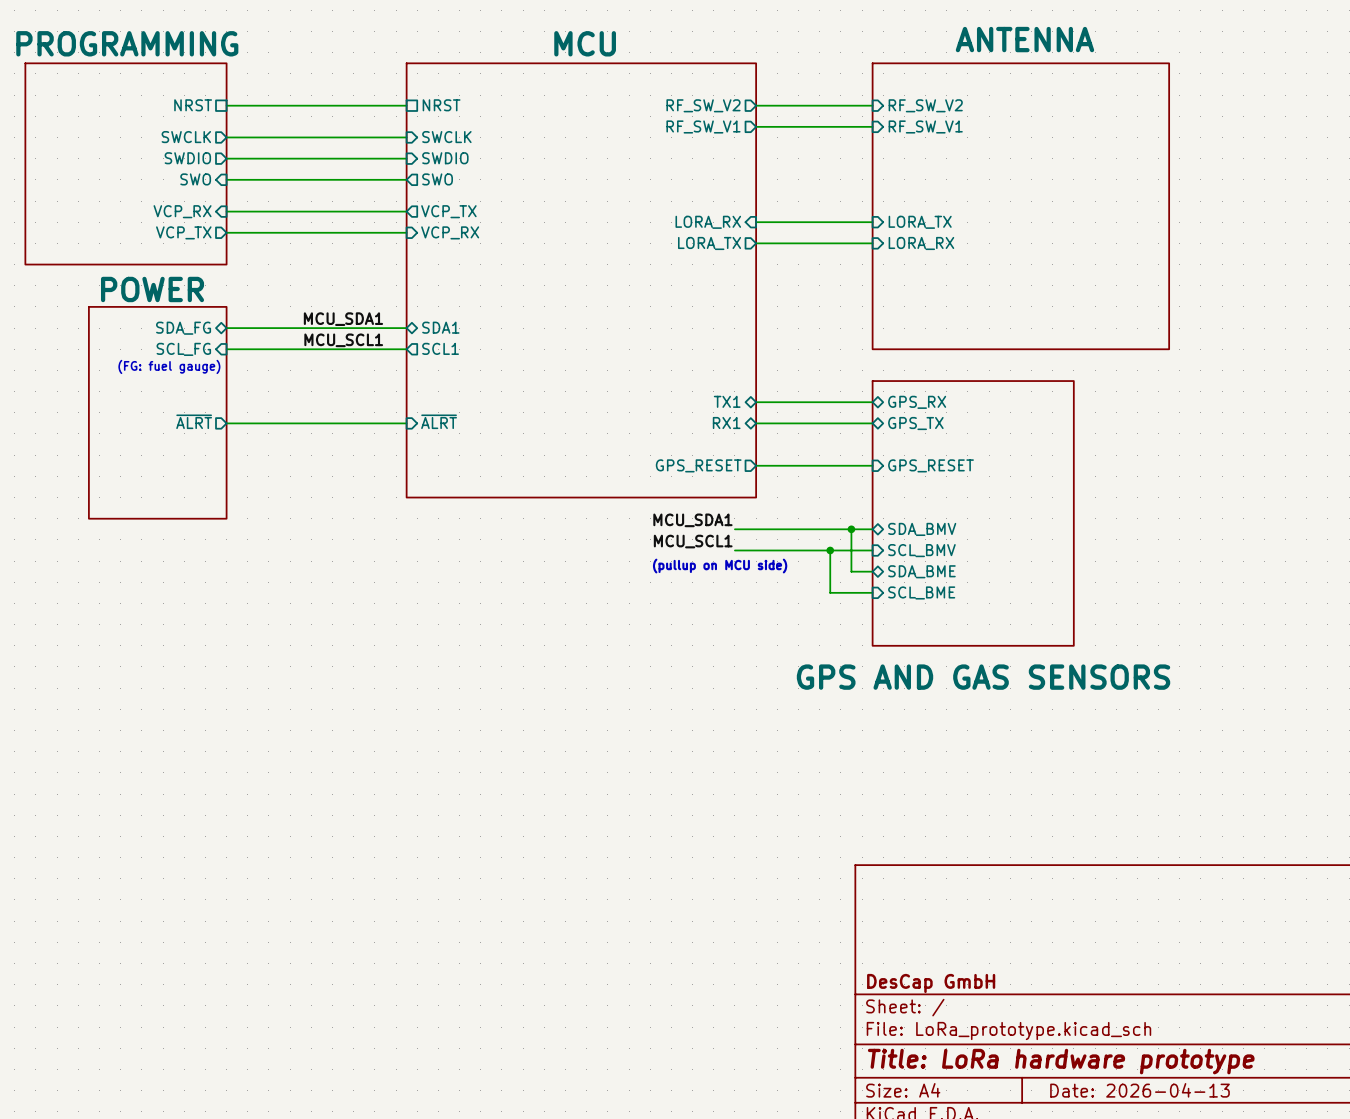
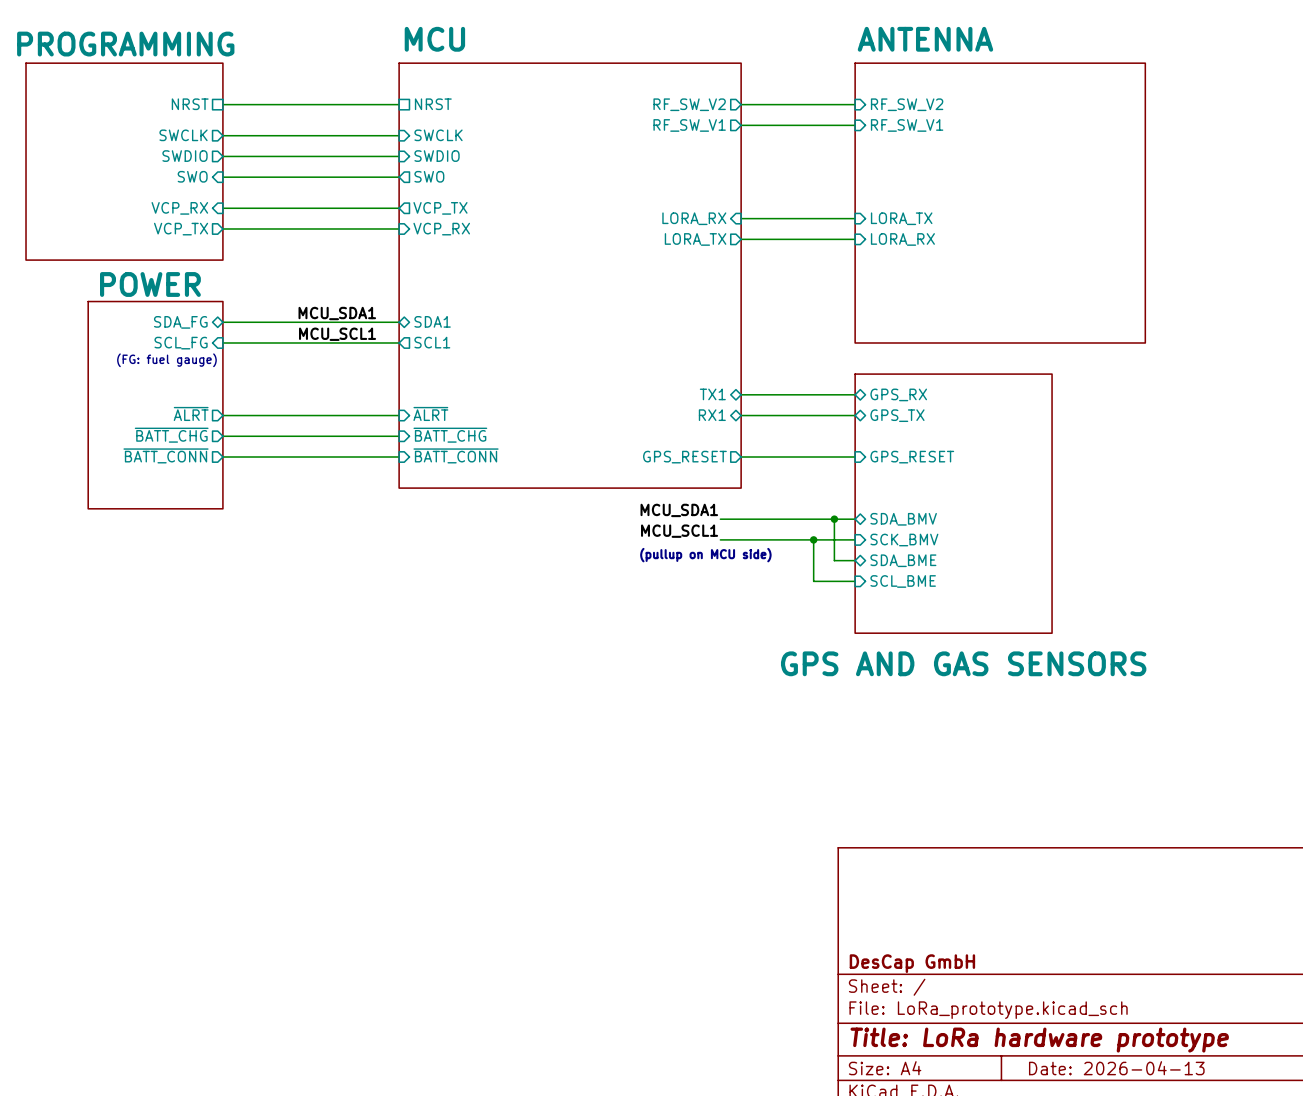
sheet ANTENNA name position: ANTENNA (1024, 39) -> ANTENNA (925, 39)
sheet MCU name position: MCU (585, 43) -> MCU (434, 39)
sheet pin: none -> ~{BATT_CHG} (171, 435)
sheet pin: none -> ~{BATT_CHG} (450, 435)
wire: none -> (222, 436) (399, 436)
sheet pin: none -> ~{BATT_CONN} (166, 455)
sheet pin: none -> ~{BATT_CONN} (456, 455)
wire: none -> (222, 457) (399, 457)
sheet pin: SCL_BMV (921, 550) -> SCK_BMV (904, 540)

